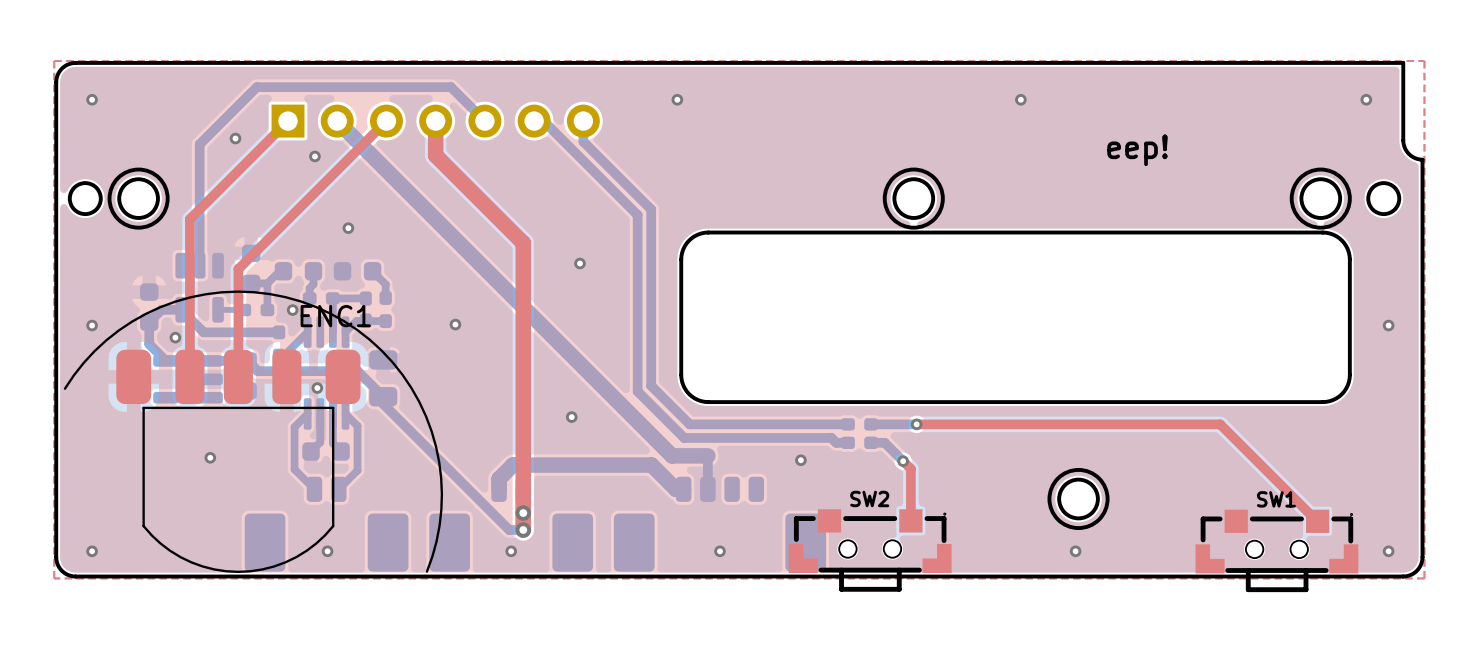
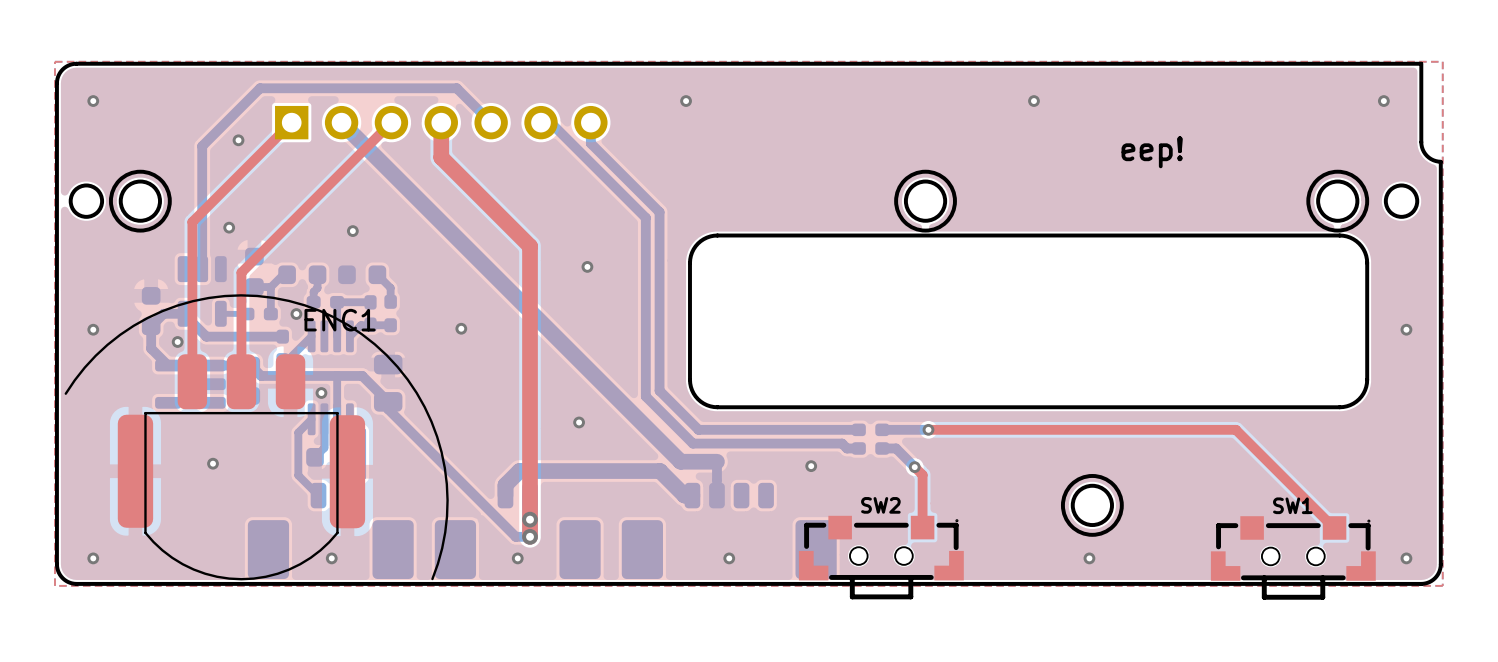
via position: (314, 156) -> (229, 227)
ENC1 footprint: [63, 290, 444, 574] -> [64, 294, 449, 581]

